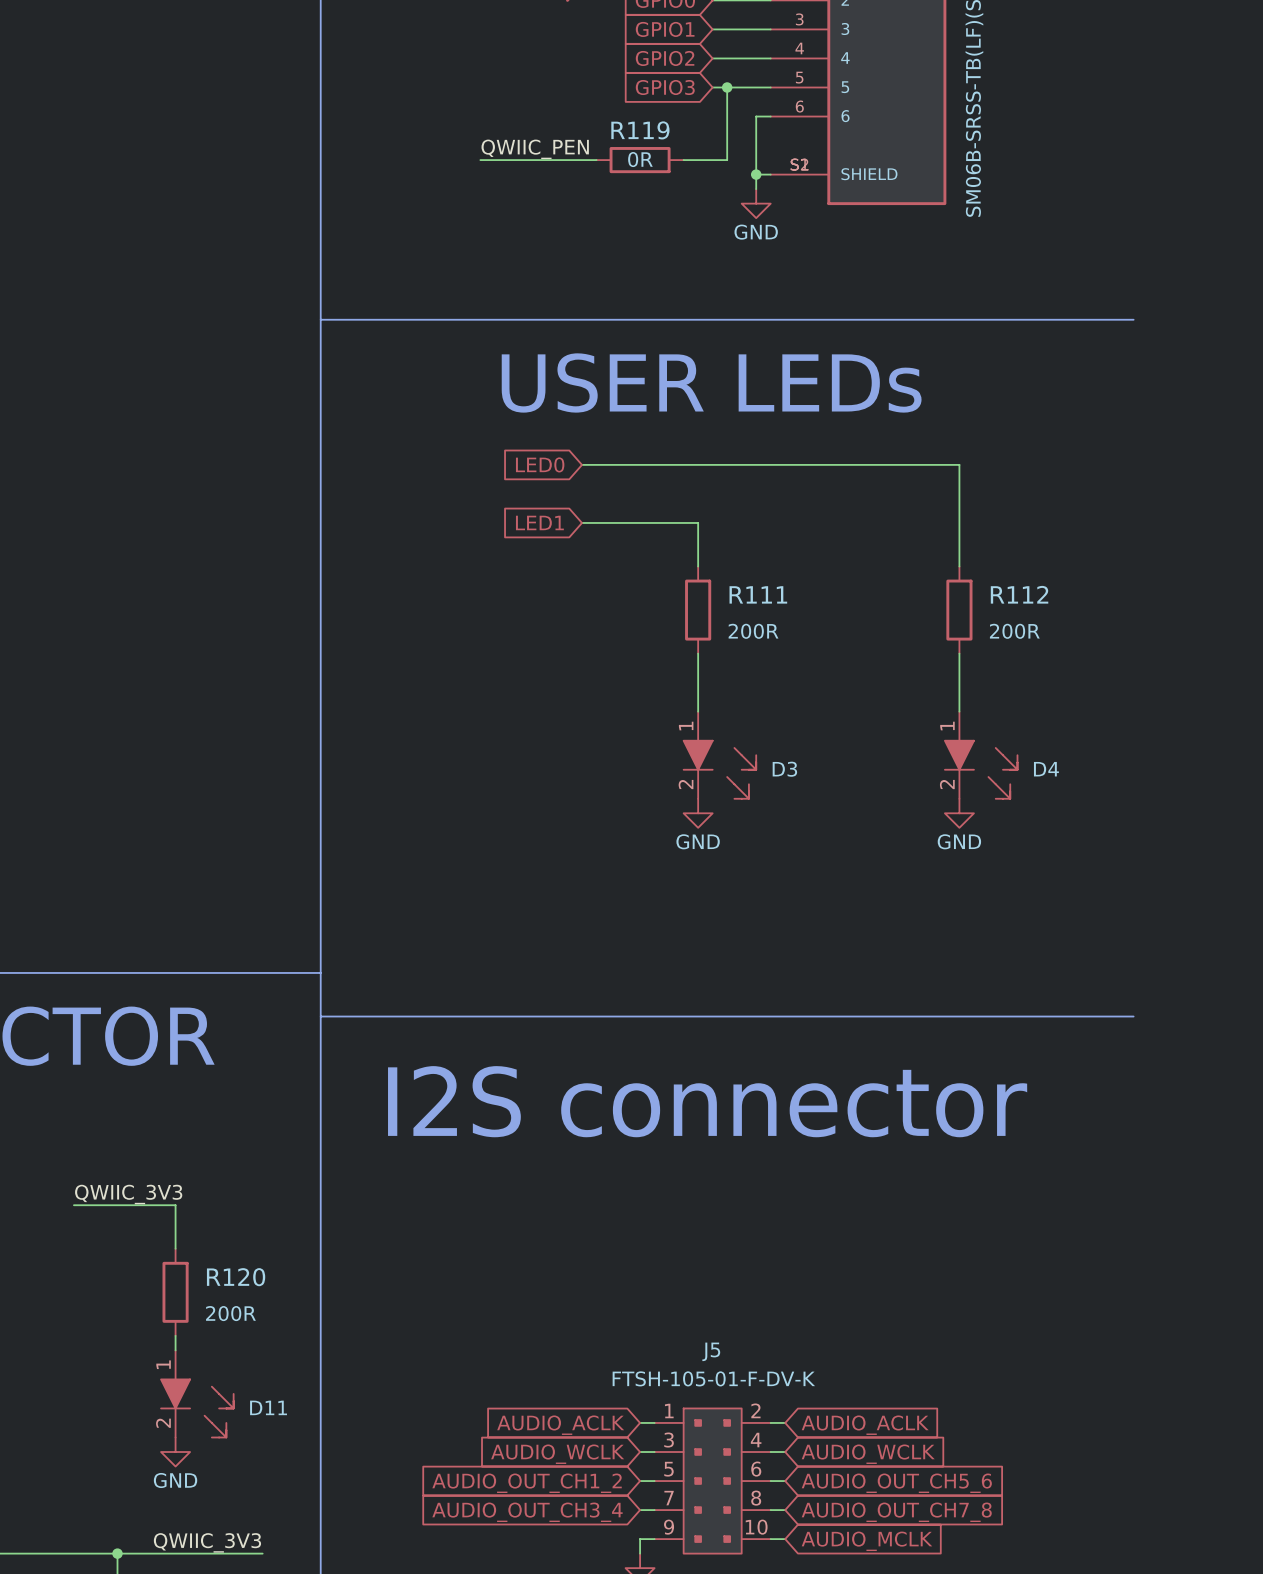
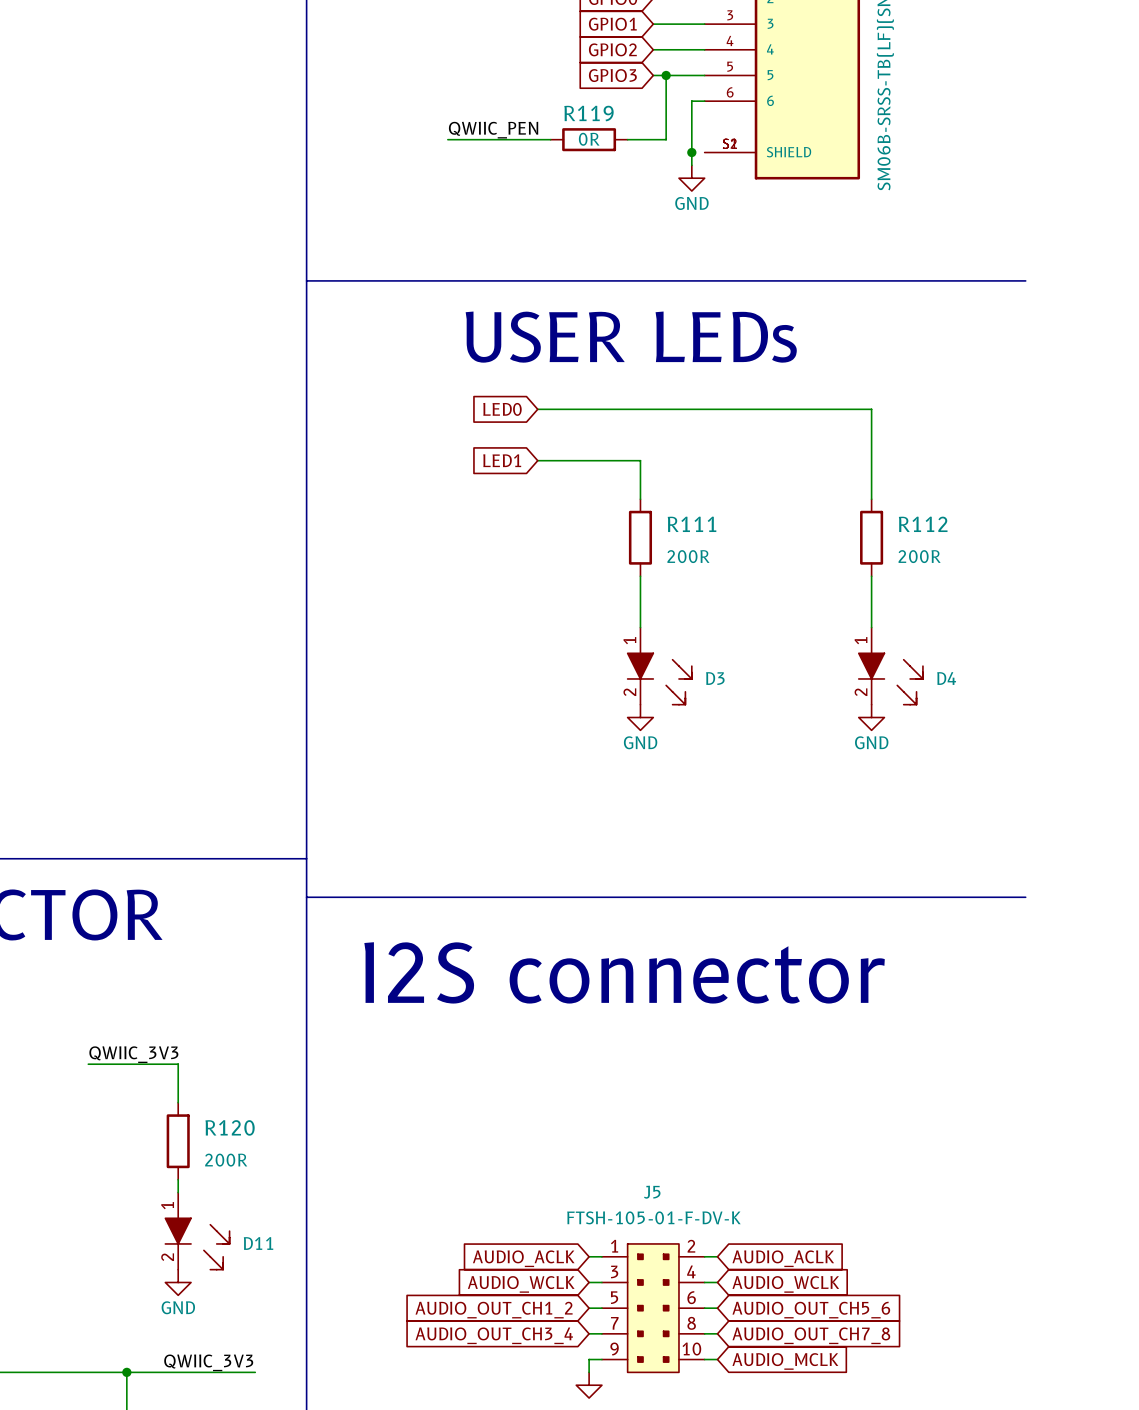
wire: (756, 174) (770, 174) -> none

